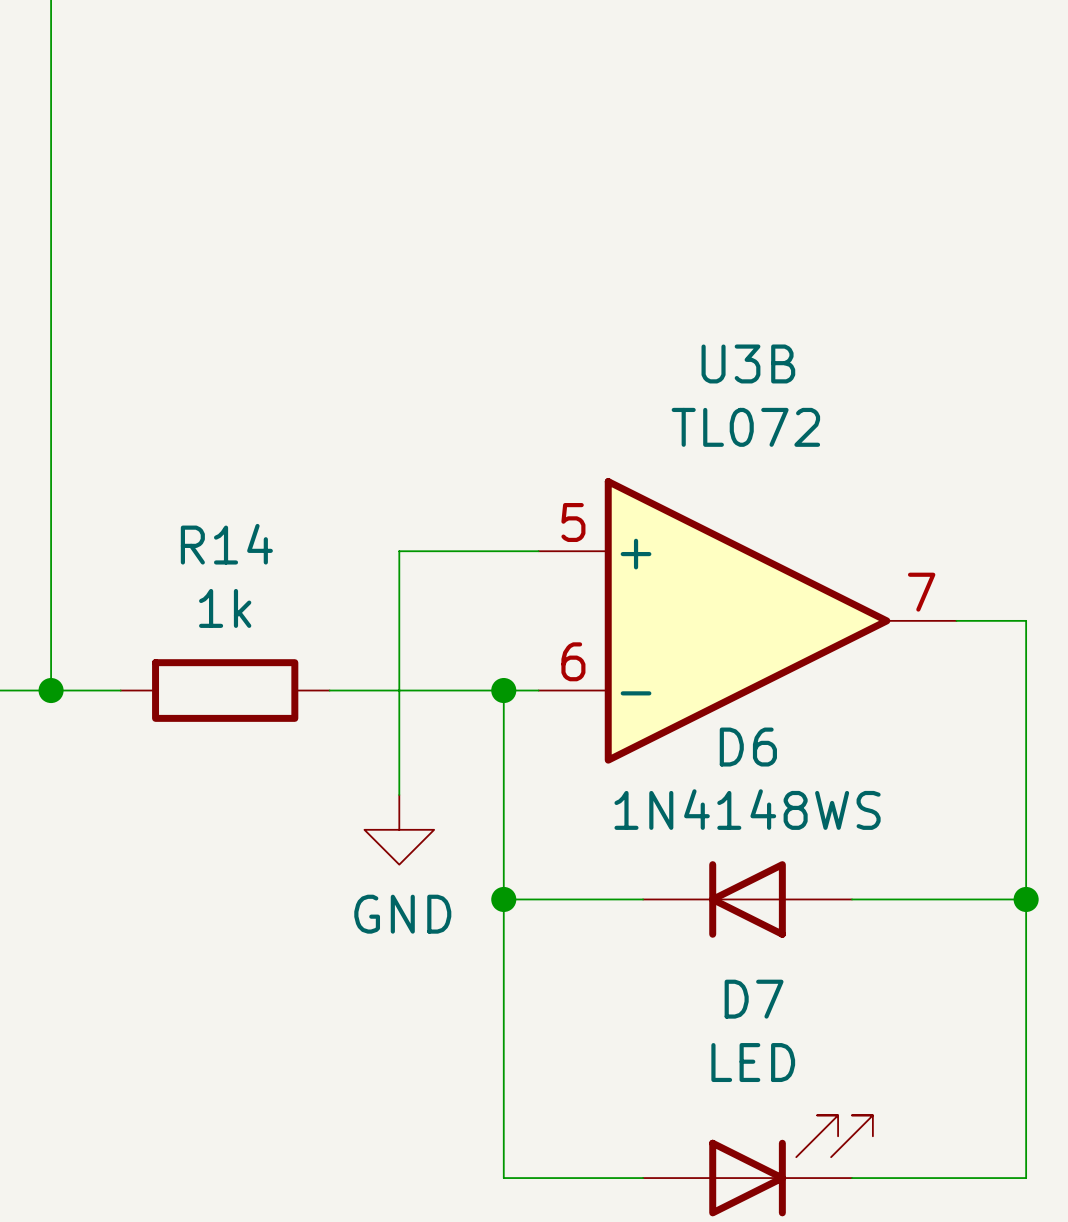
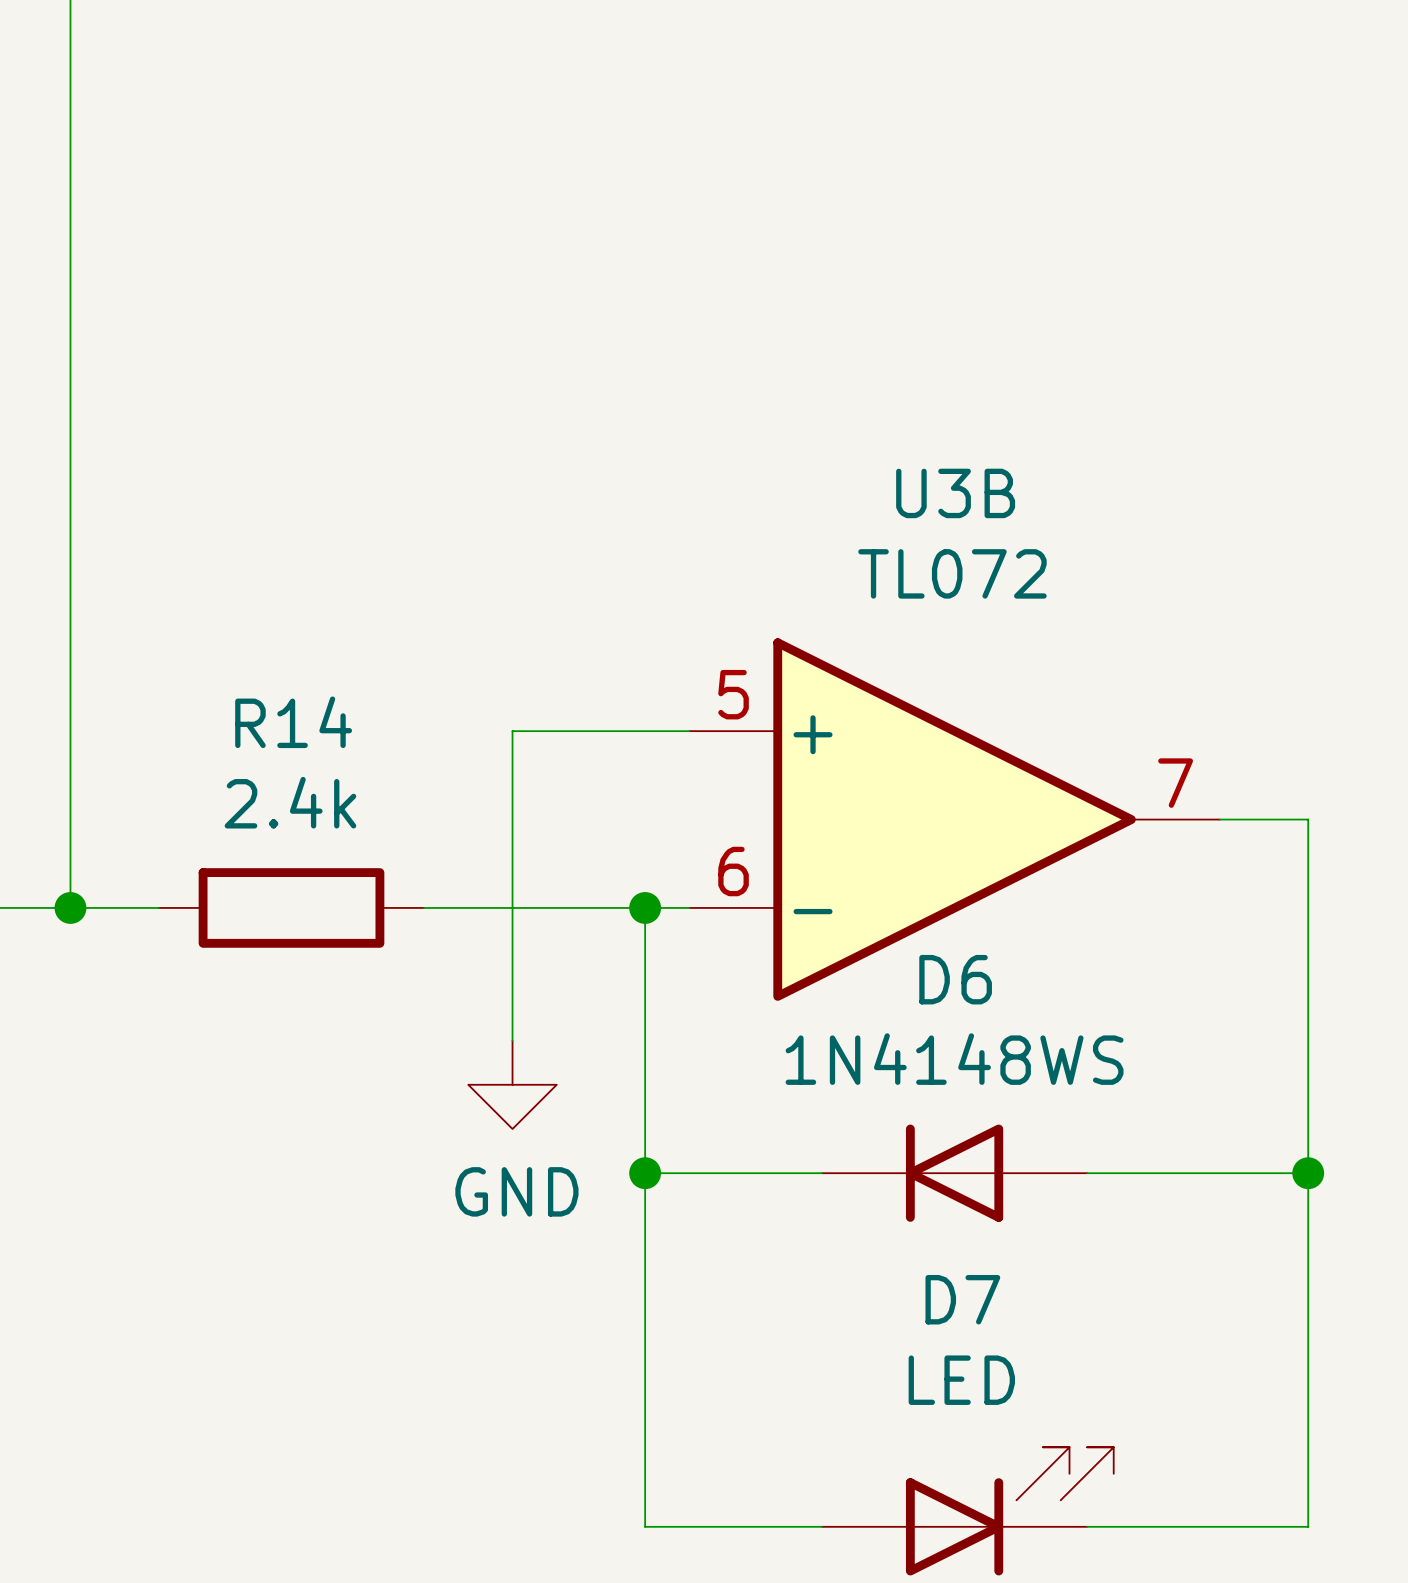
R14 value: 1k (225, 608) -> 2.4k (290, 802)

